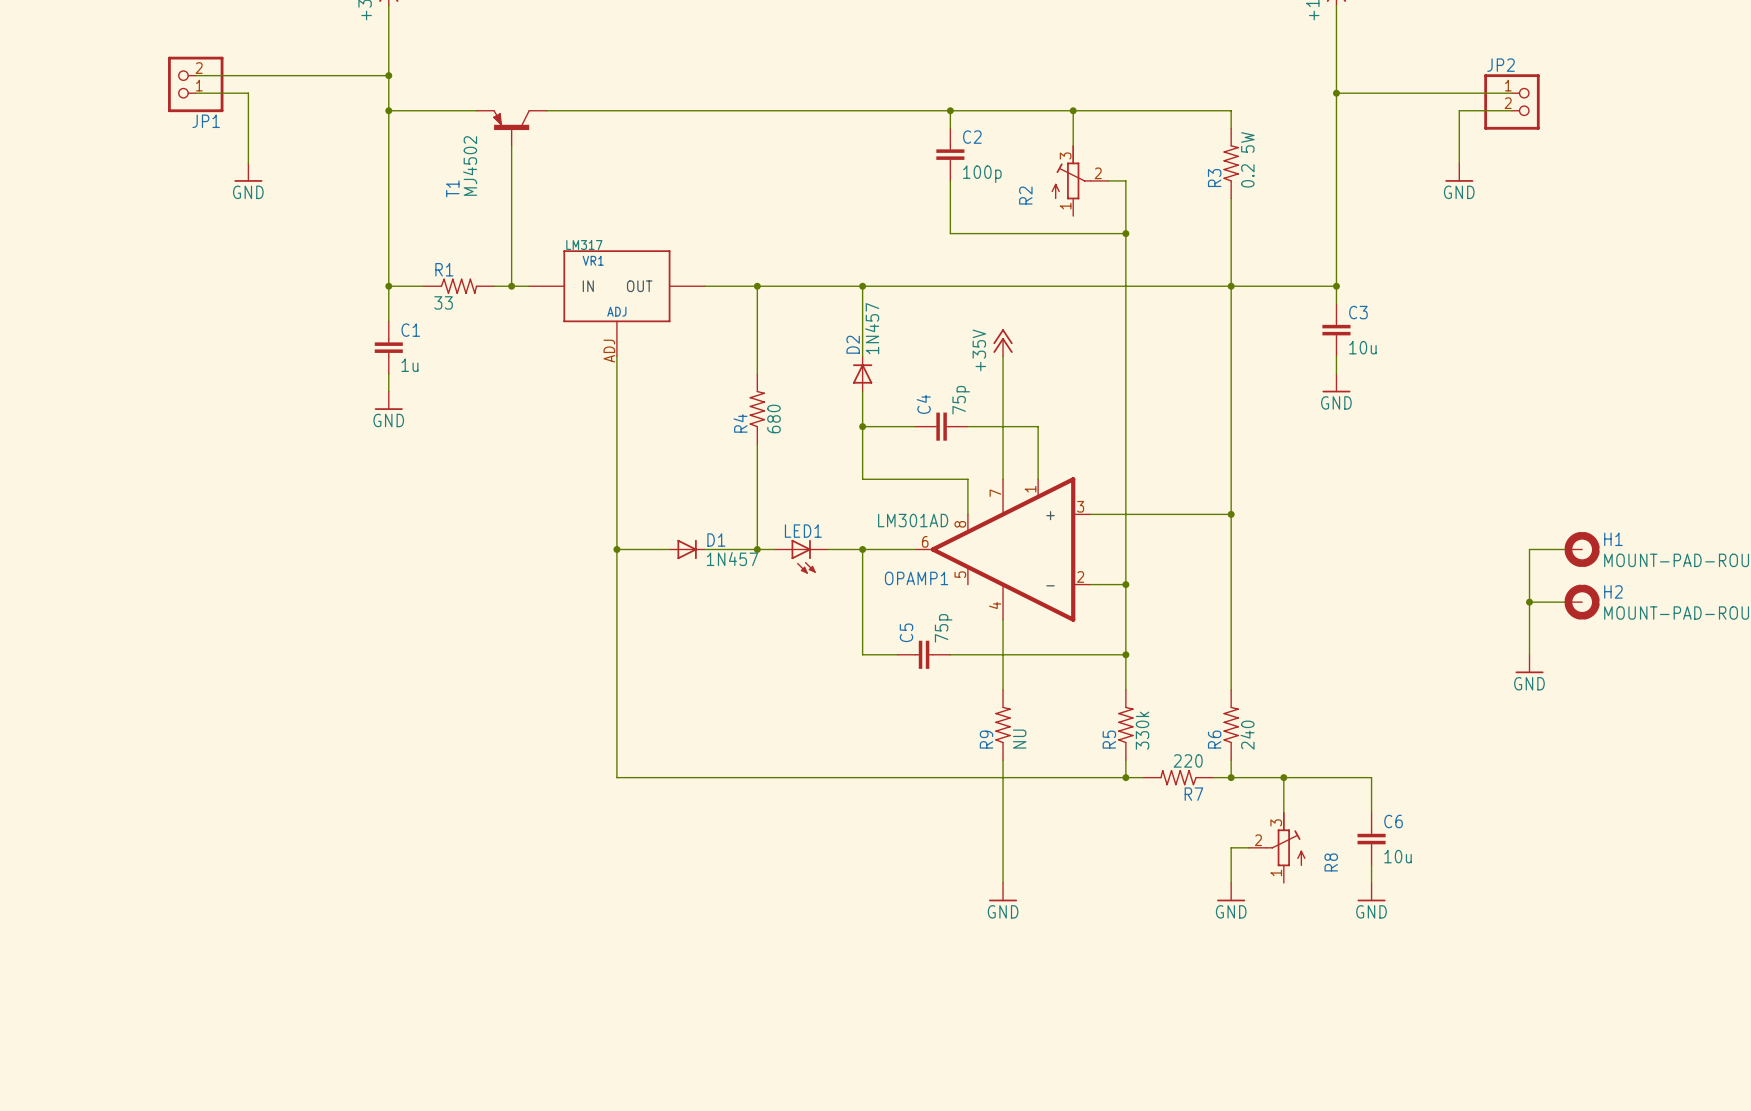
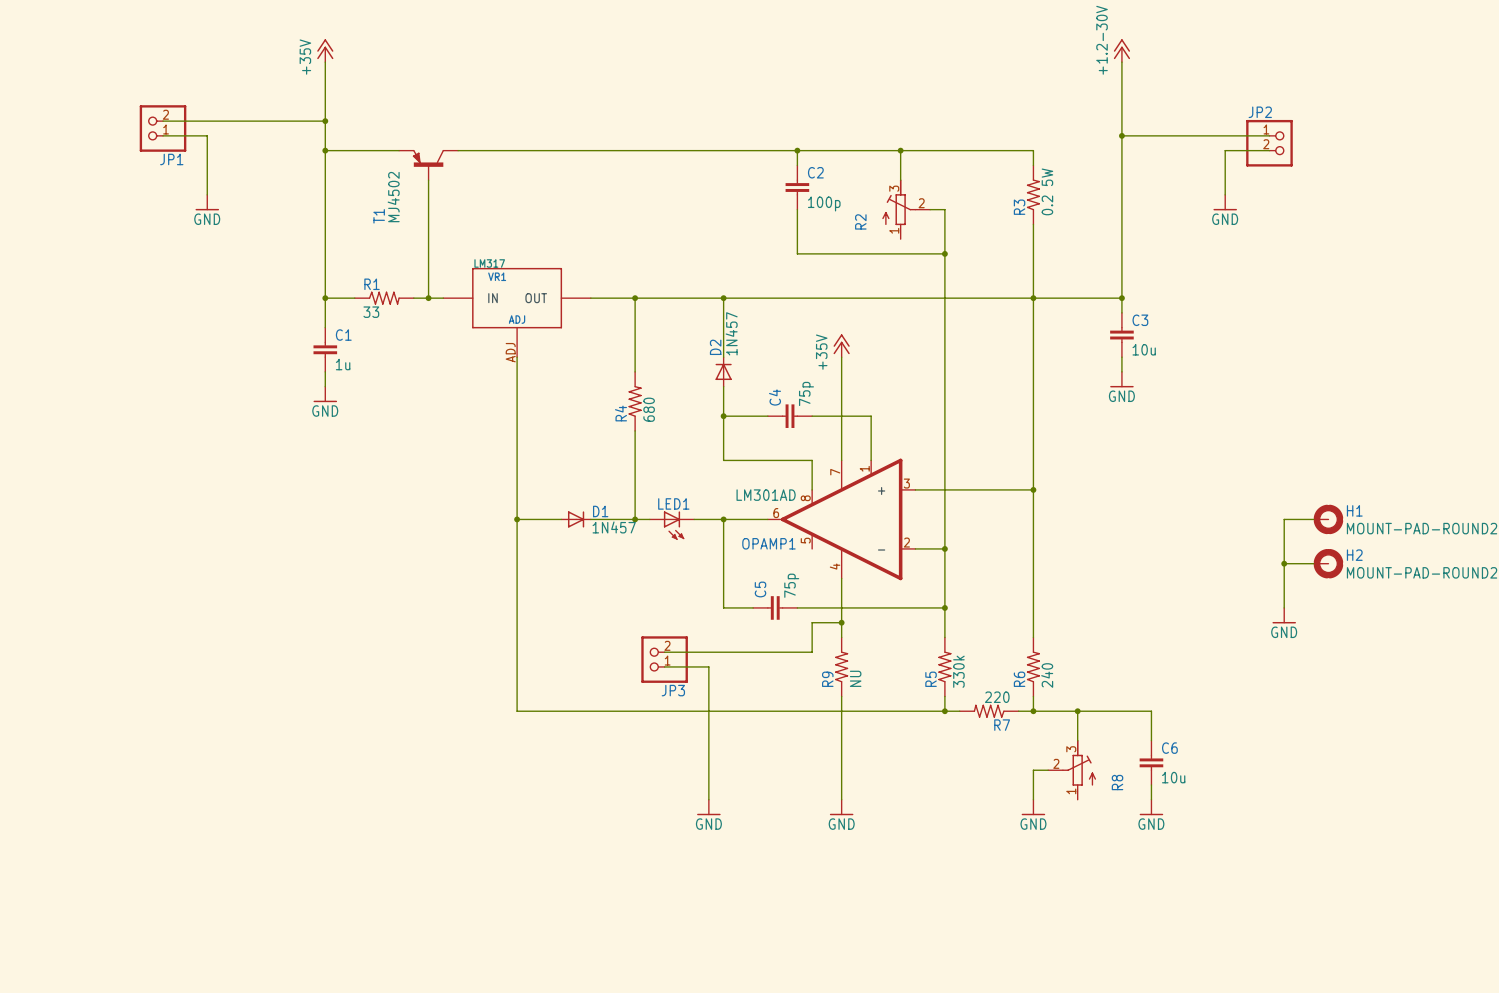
wire: none -> (841, 622) (812, 622) (812, 652) (664, 652)
junction: none -> (841, 622)
JP3: none -> (664, 659)
wire: none -> (664, 666) (708, 666) (708, 799)
power symbol: none -> GND (708, 807)

